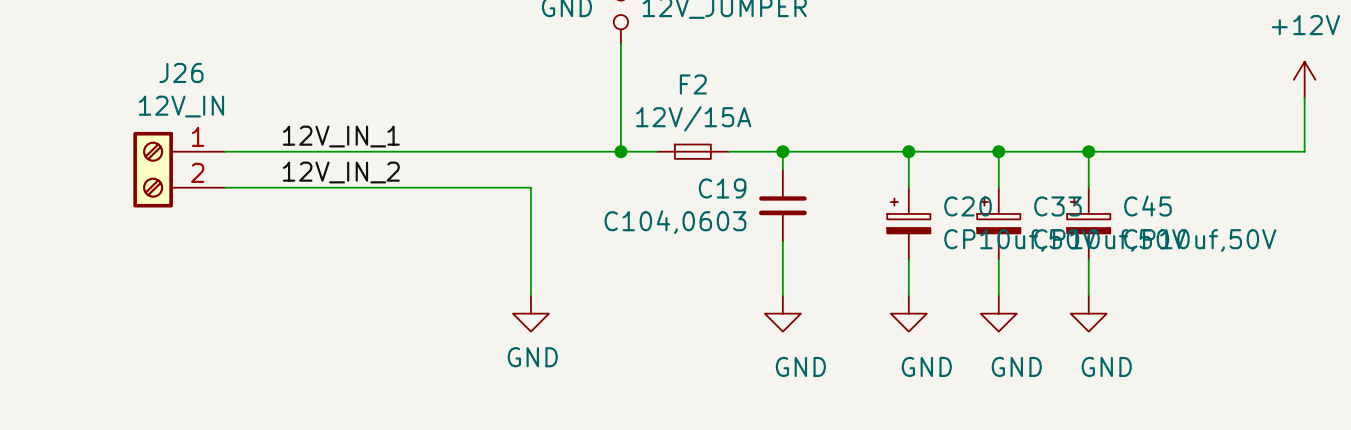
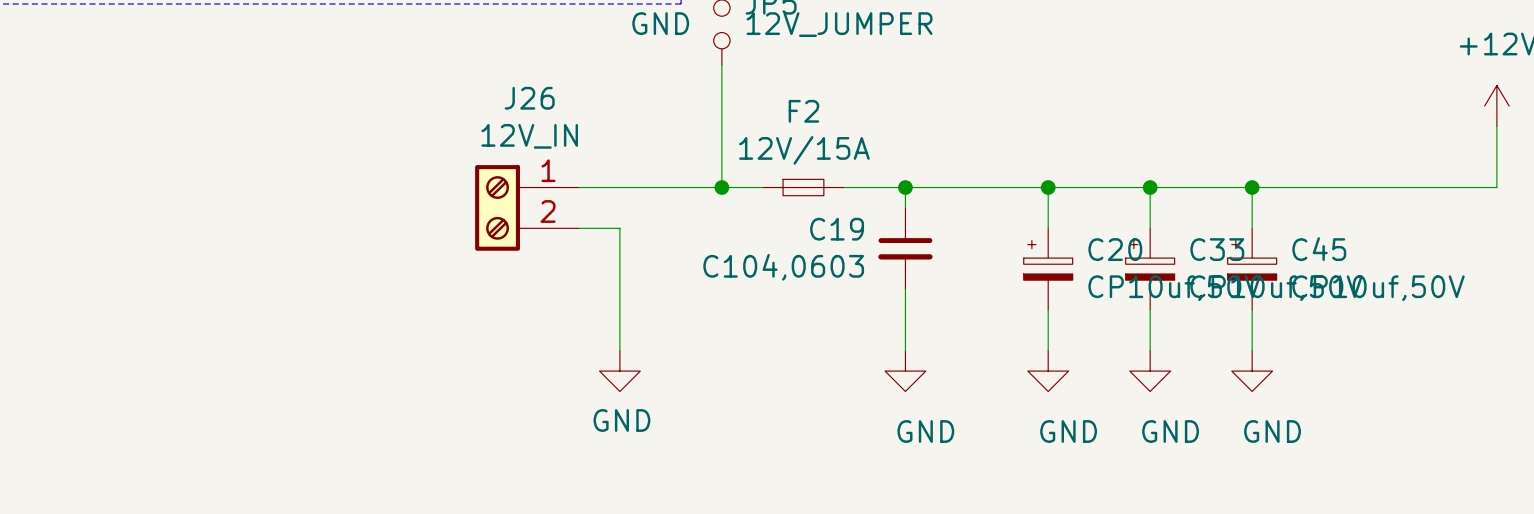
label: 12V_IN_1 (341, 136) -> none
wire: (225, 151) (494, 151) -> none
J26 position: (179, 169) -> (527, 207)
label: 12V_IN_2 (341, 172) -> none
wire: (225, 187) (494, 187) -> none

